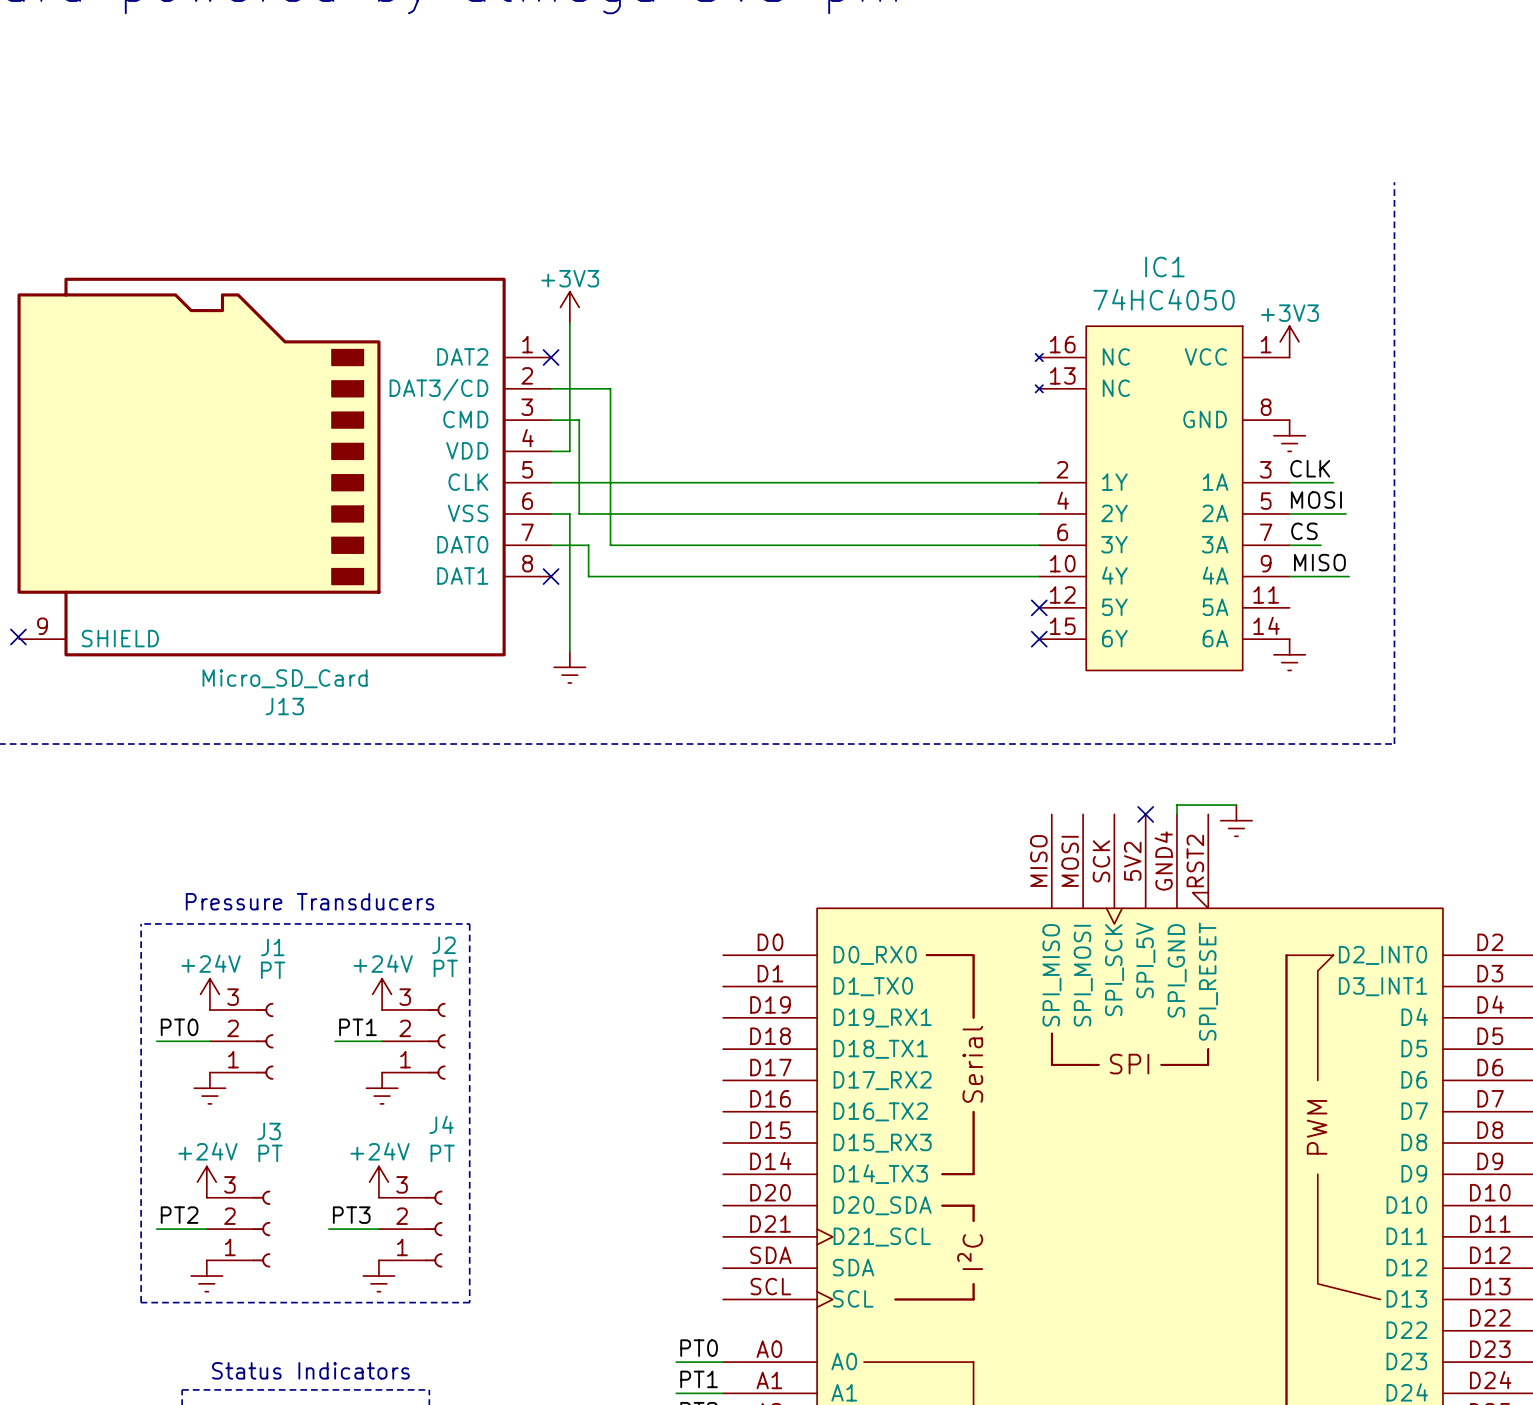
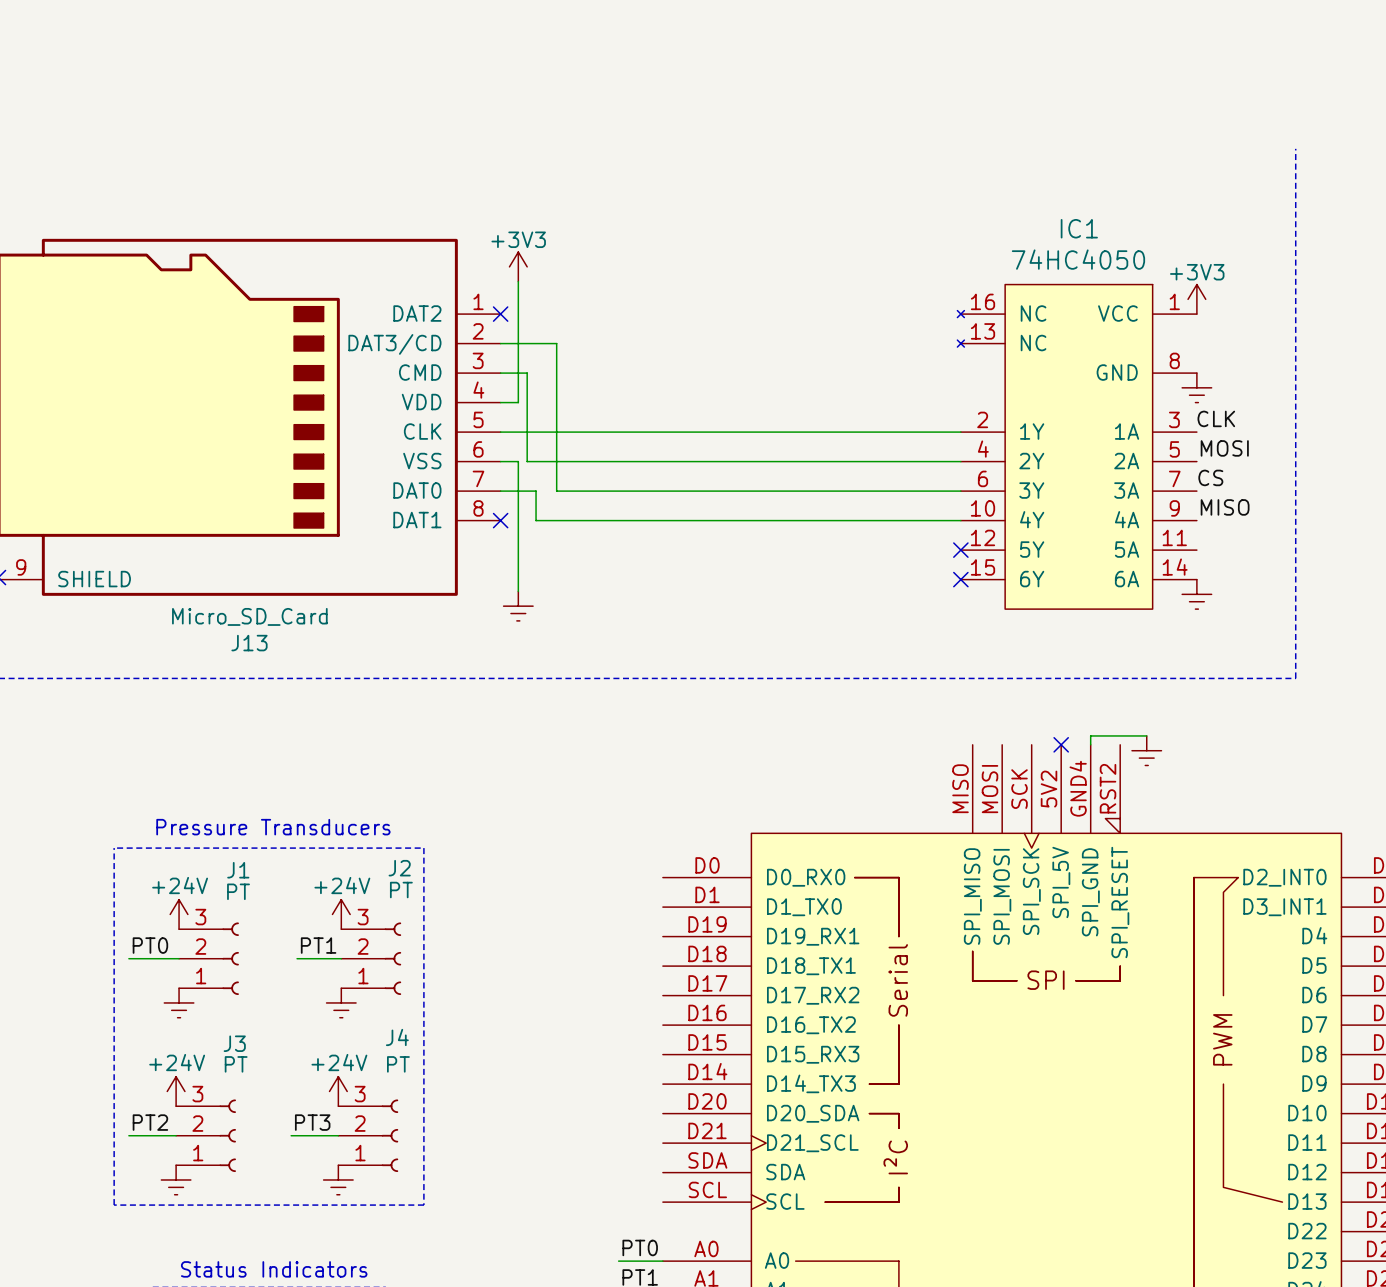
wire: (1289, 482) (1333, 482) -> none
label position: MOSI (1316, 500) -> MOSI (1224, 448)
wire: (1289, 513) (1345, 513) -> none
wire: (1289, 545) (1320, 545) -> none
label position: MISO (1319, 562) -> MISO (1225, 507)
wire: (1289, 576) (1349, 576) -> none

